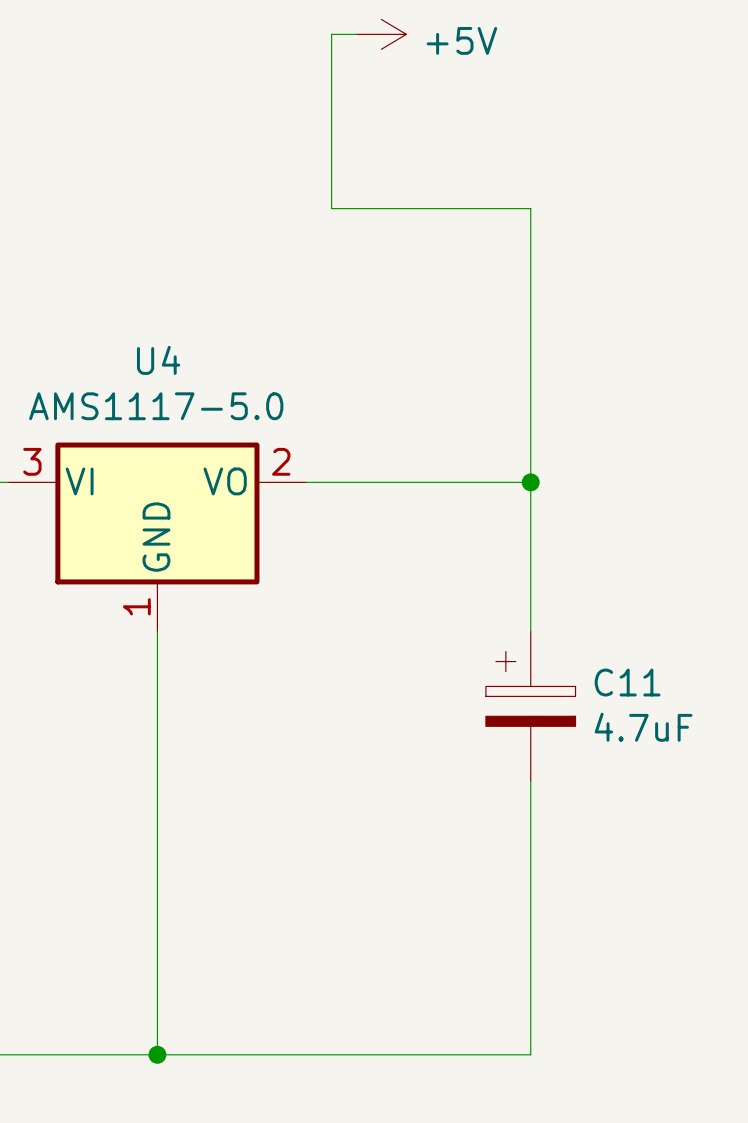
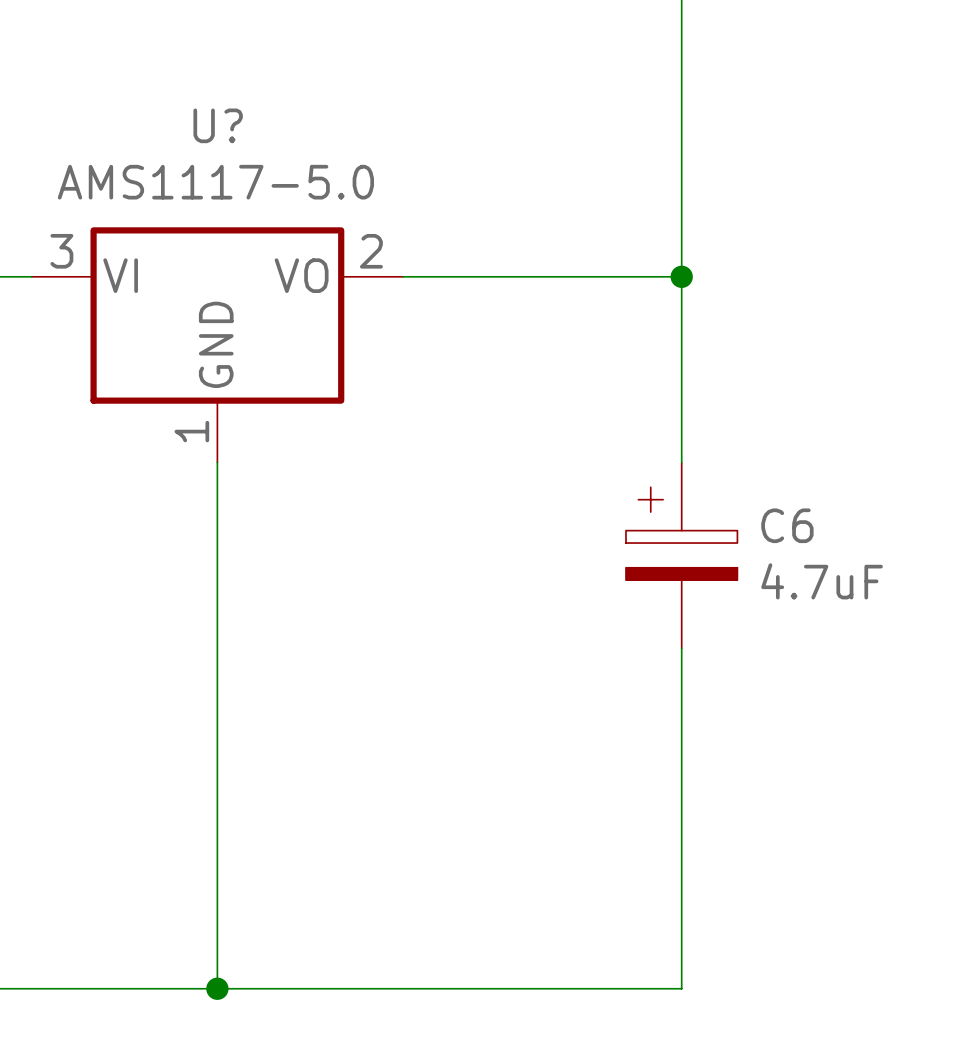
U4 name: U4 (158, 360) -> U? (218, 125)
C11 name: C11 (627, 682) -> C6 (787, 525)

